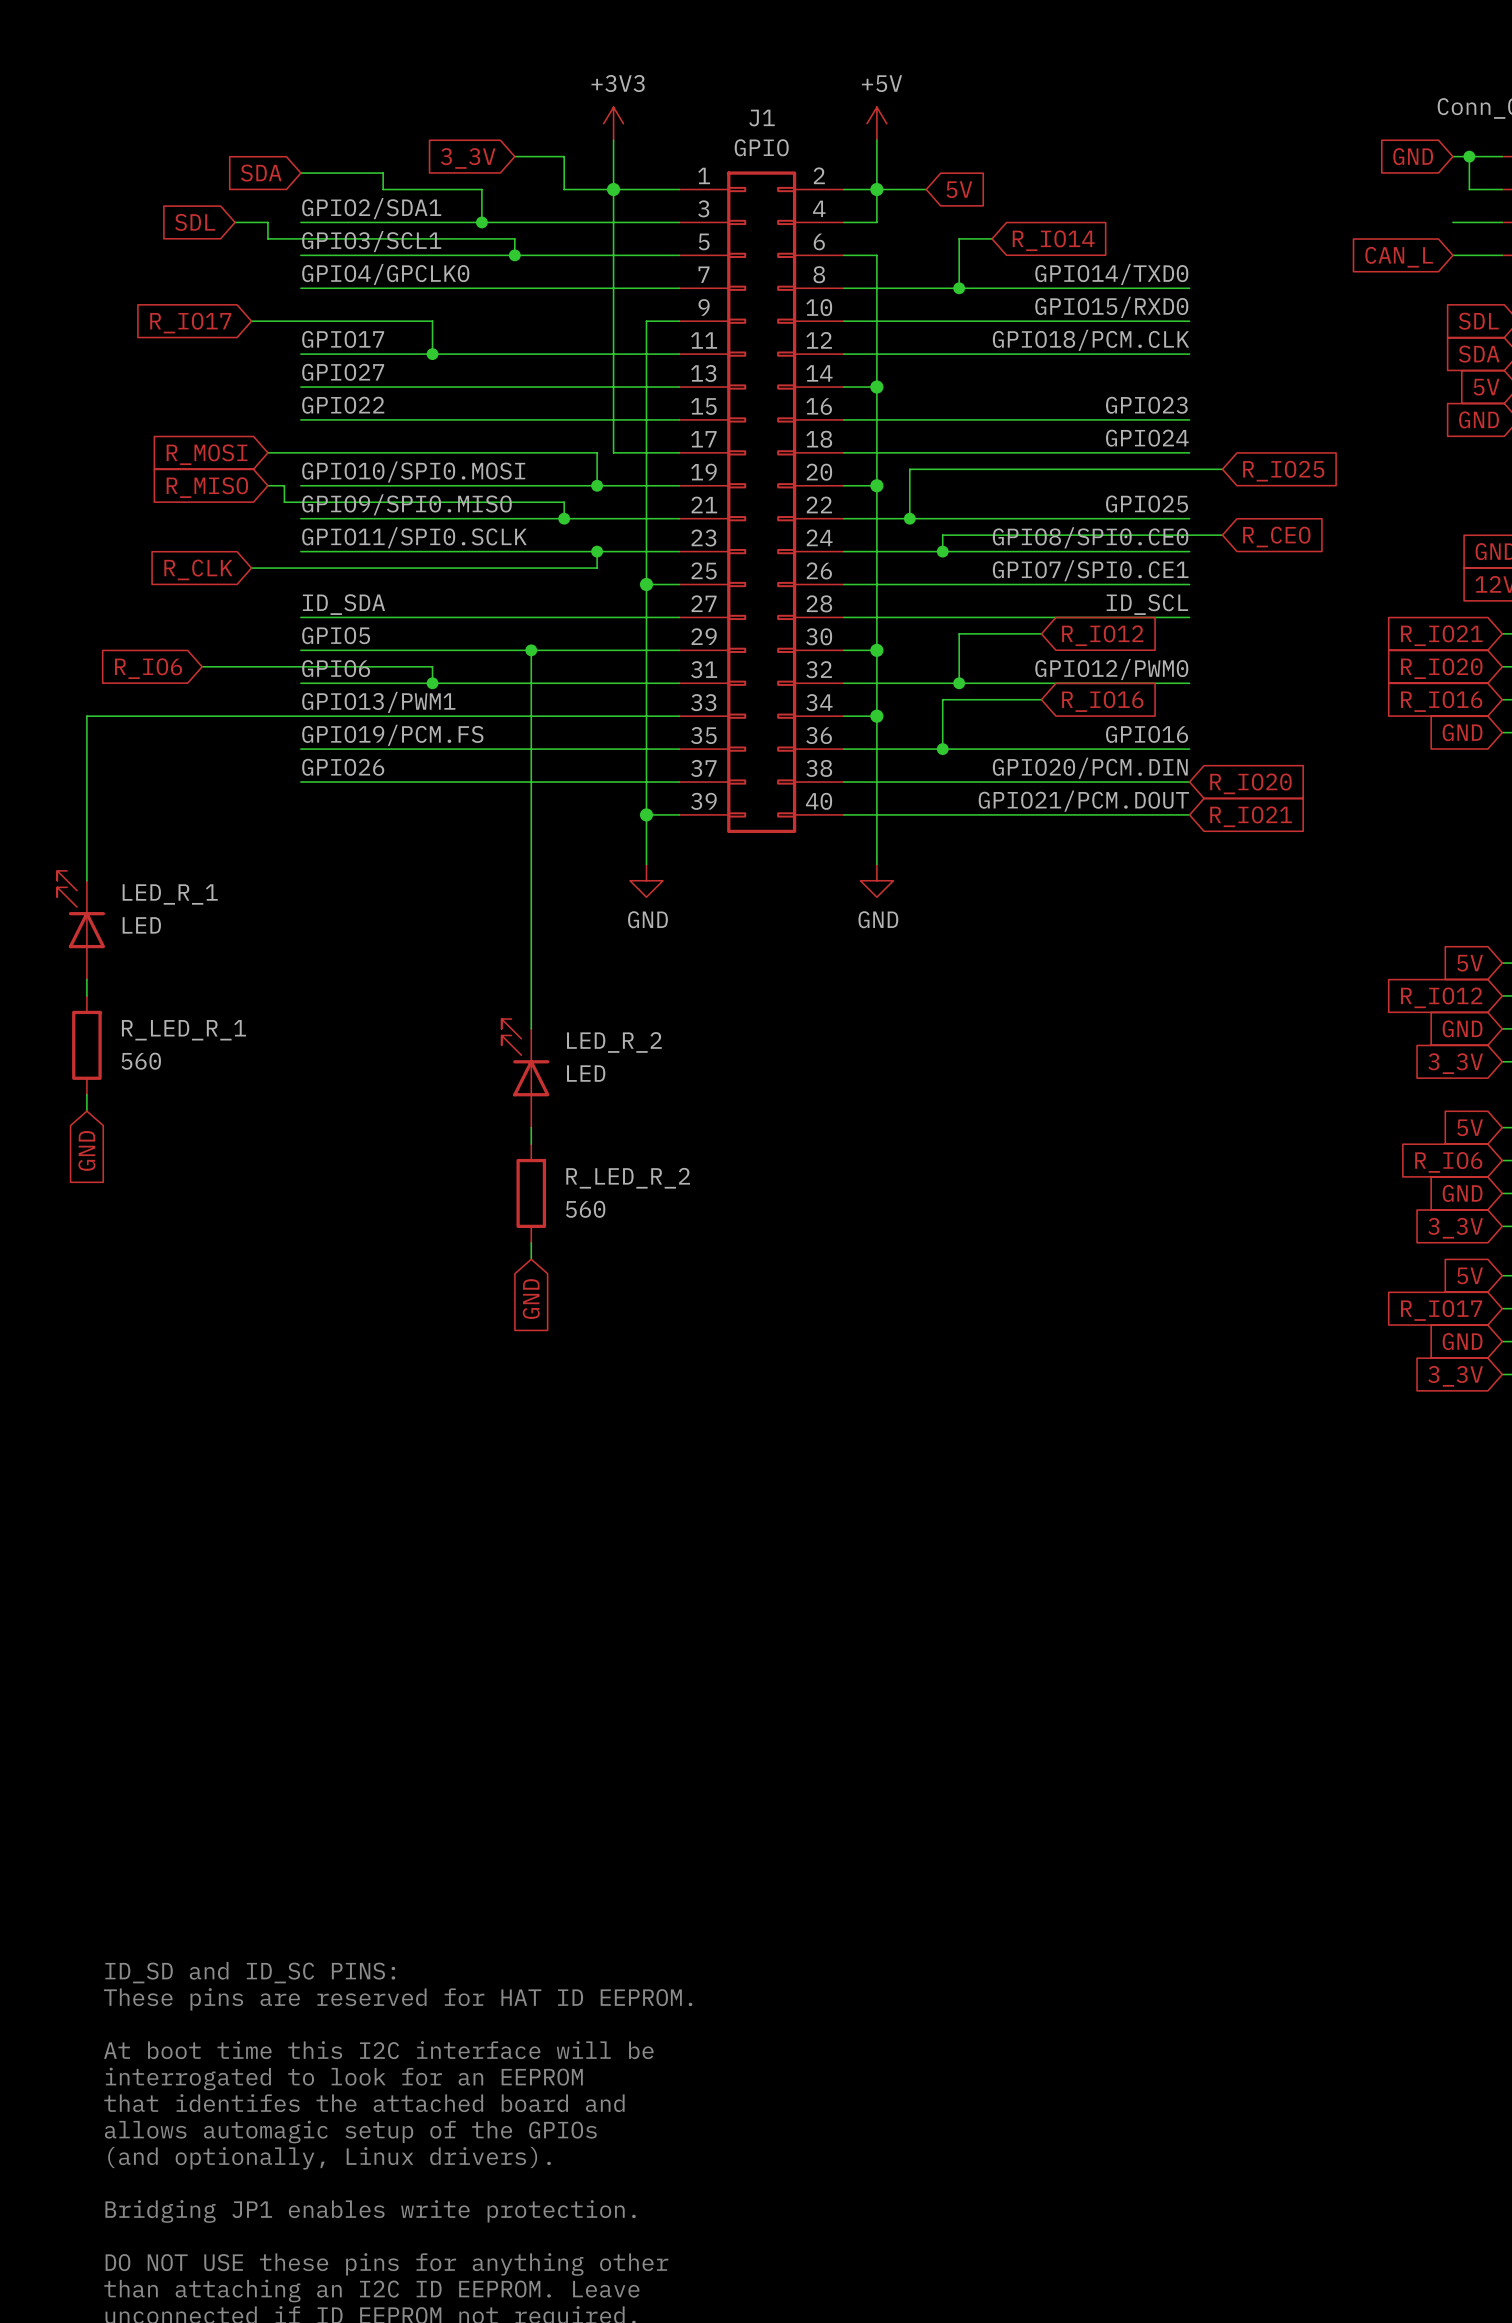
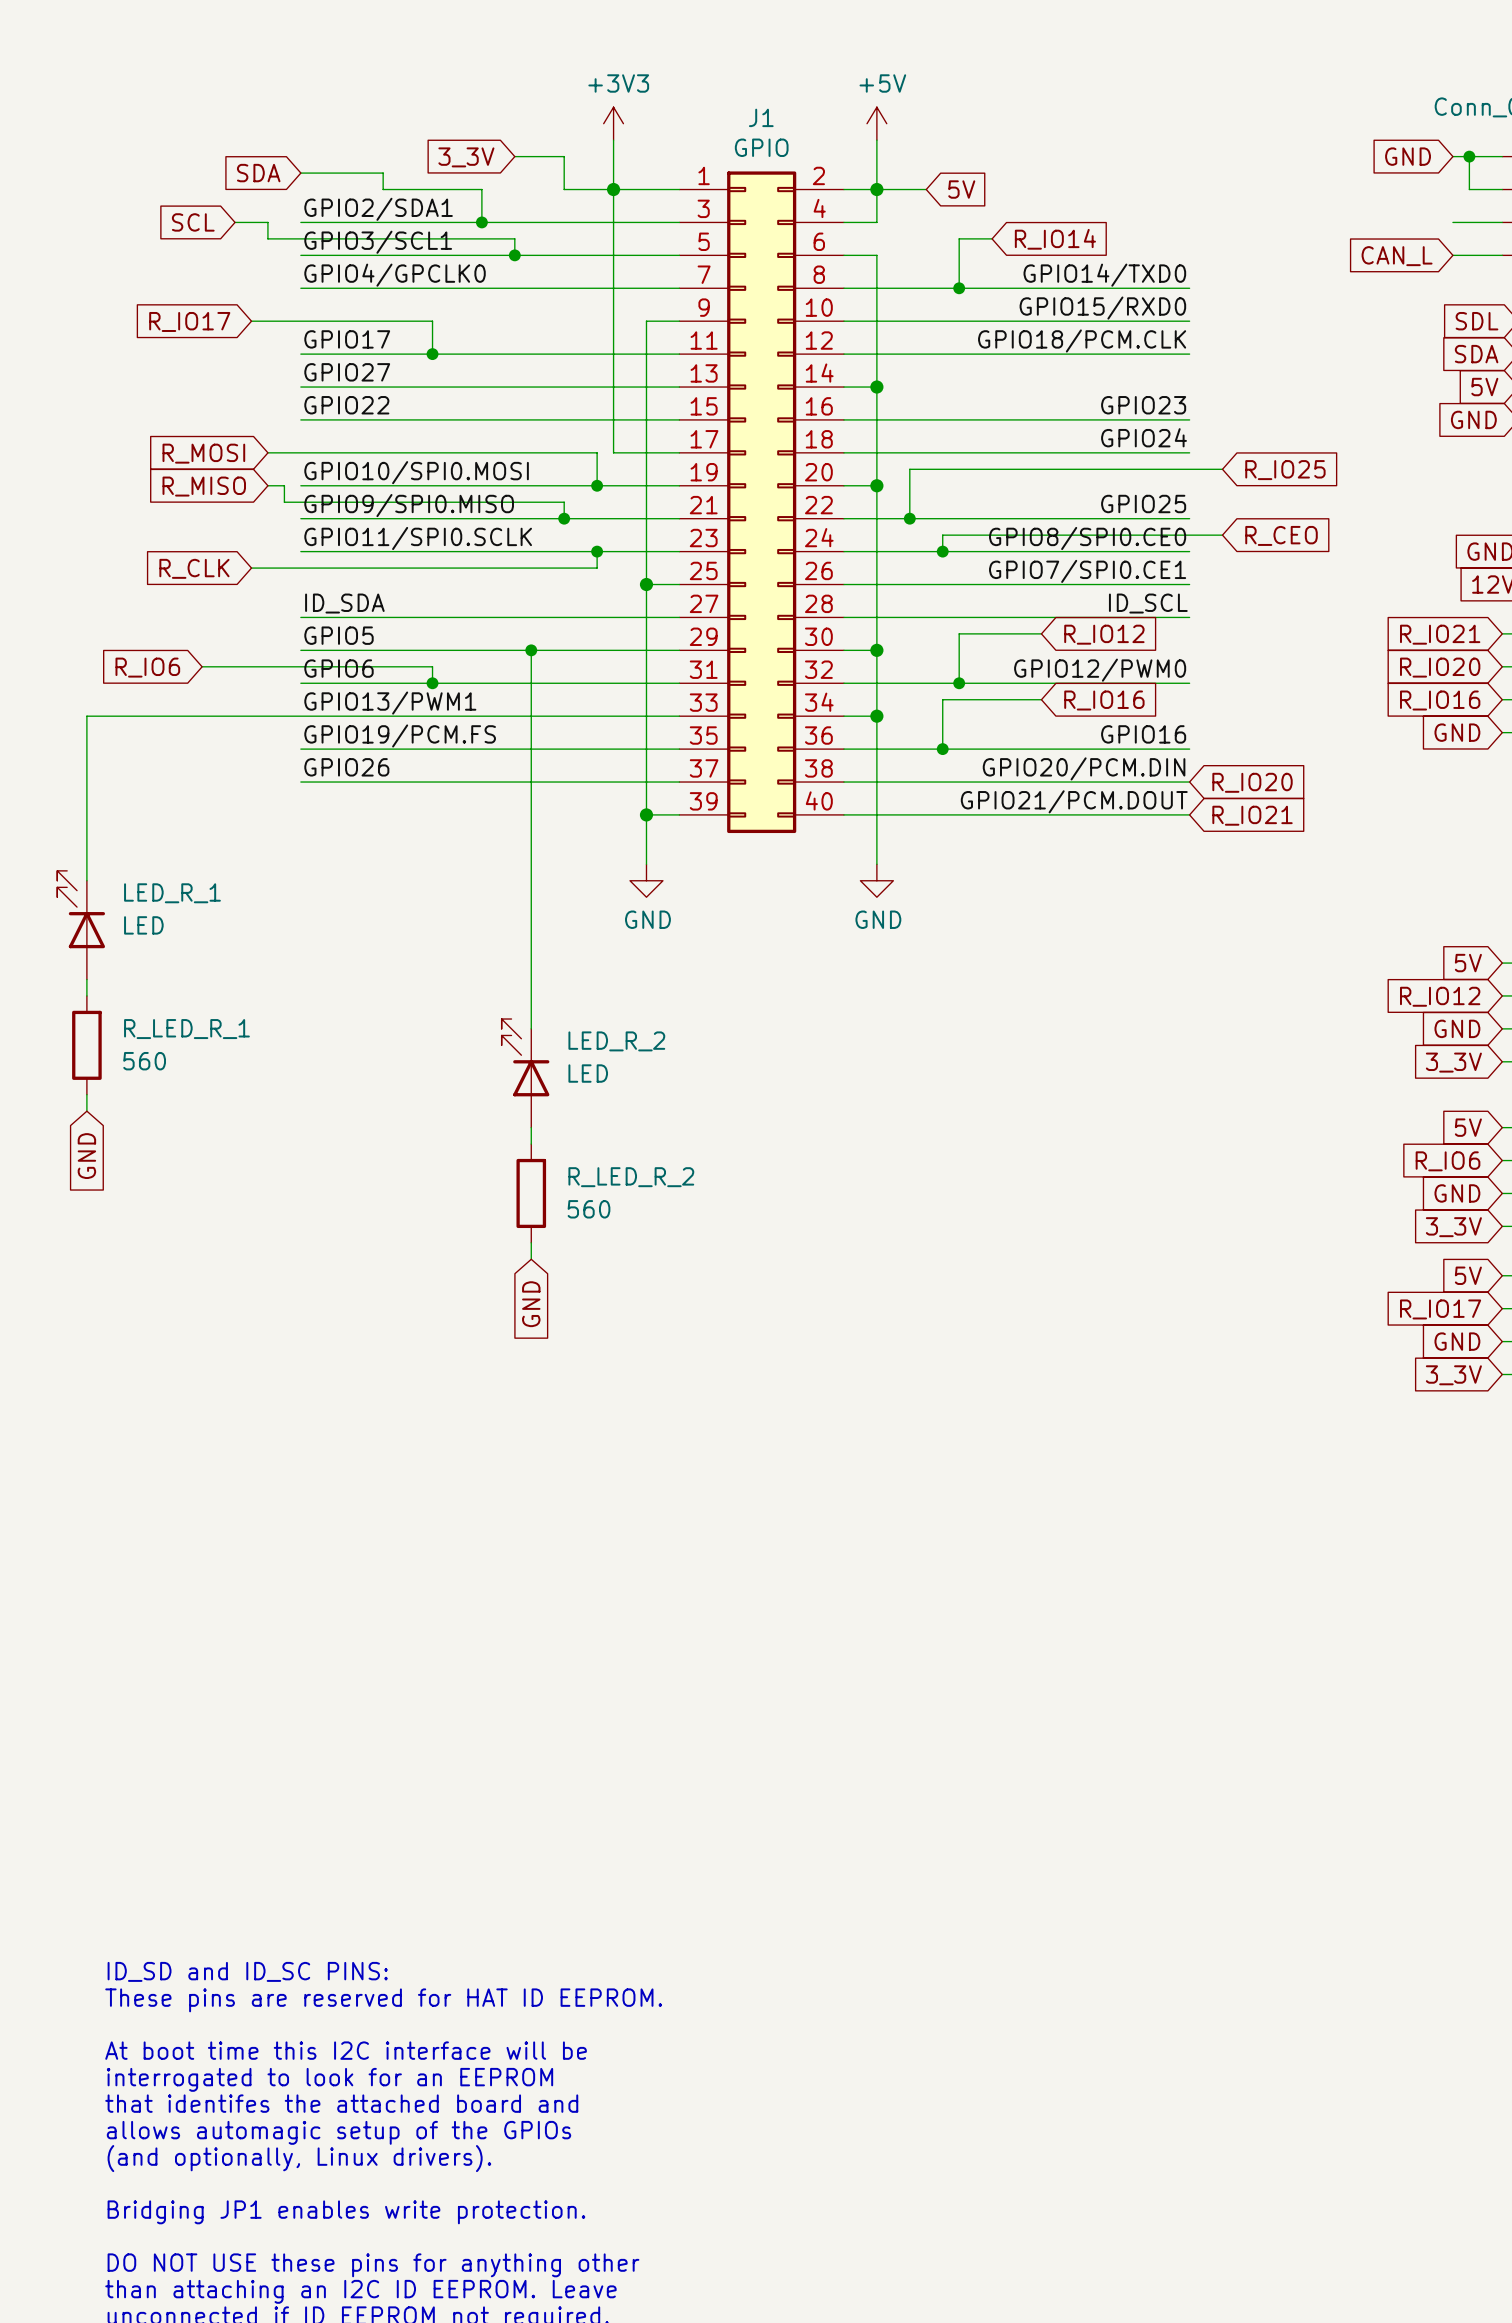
global label: SDL (195, 222) -> SCL (193, 222)

